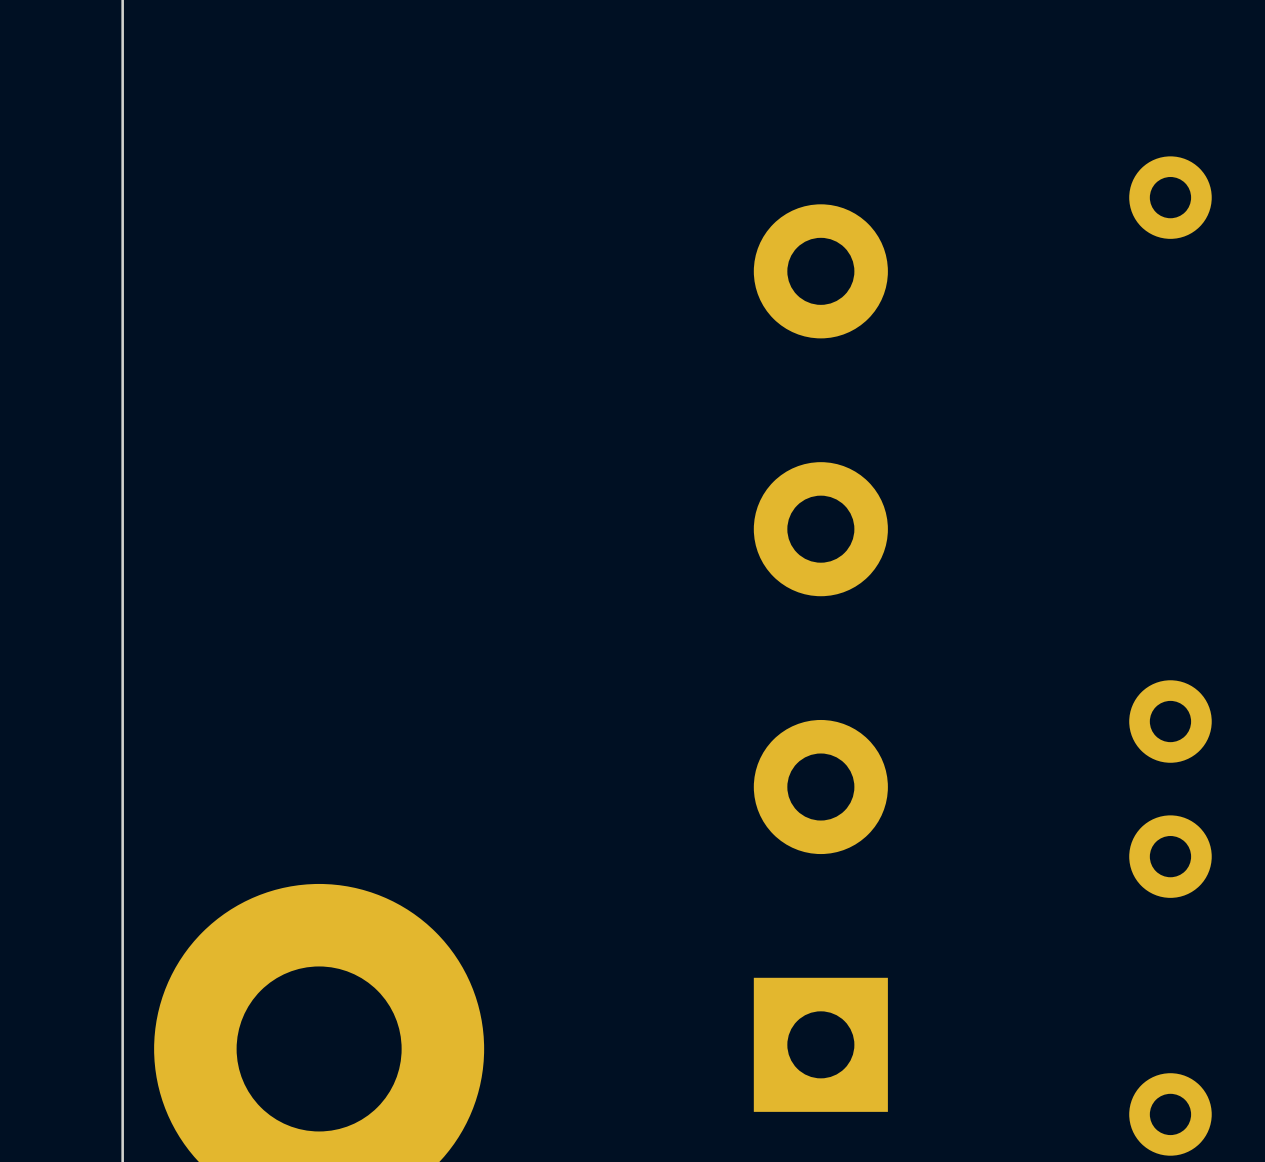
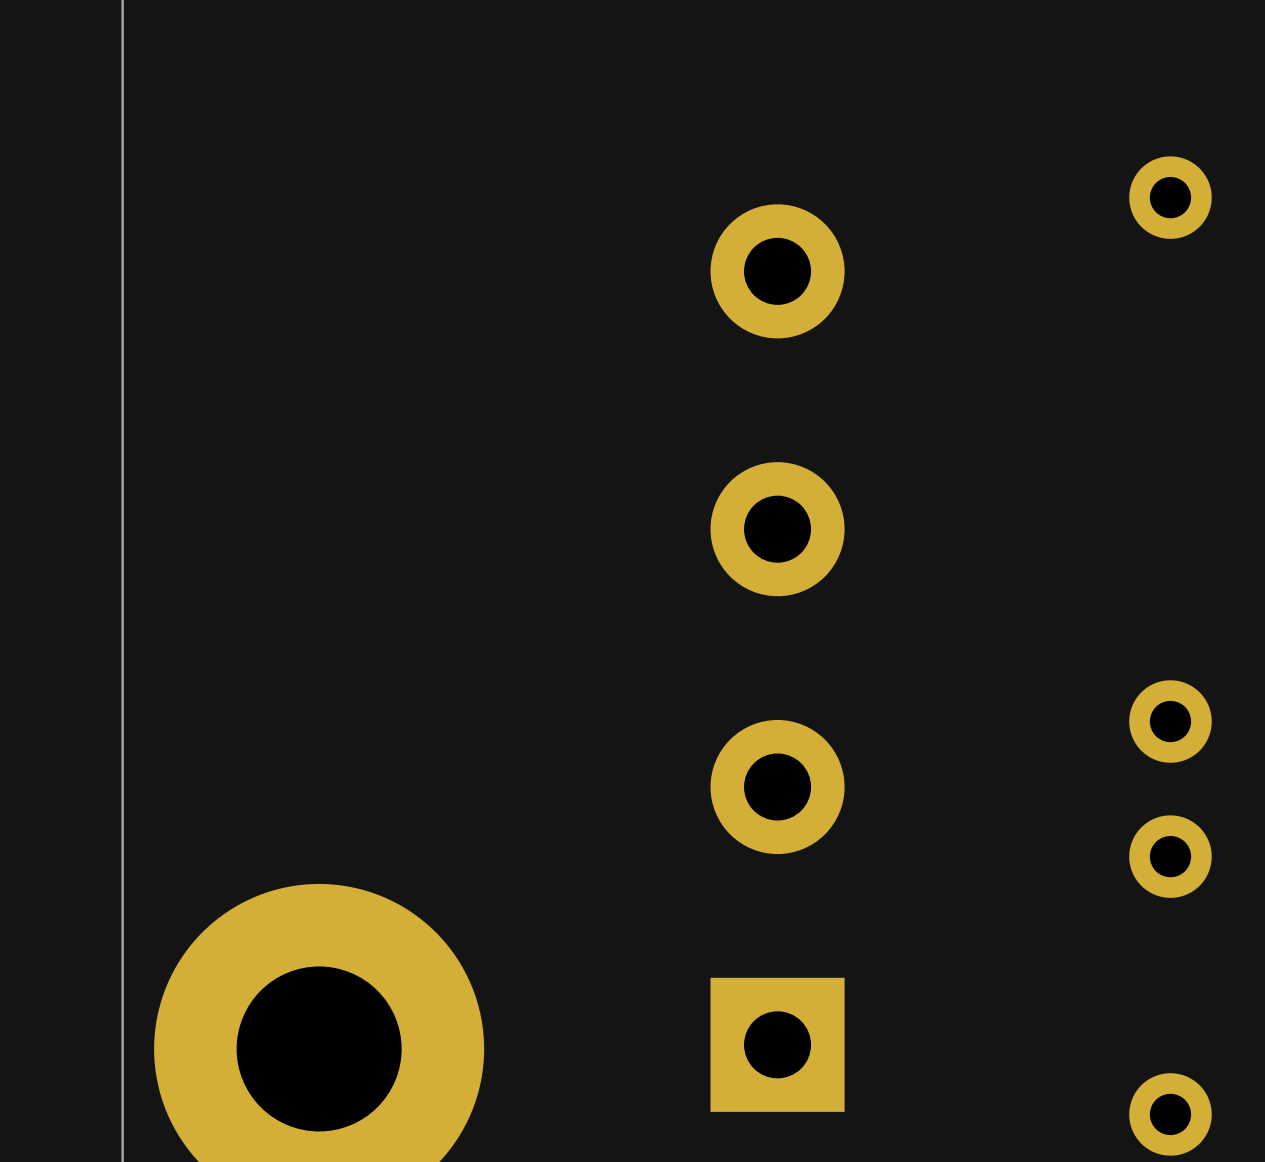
part position: (820, 658) -> (777, 658)

